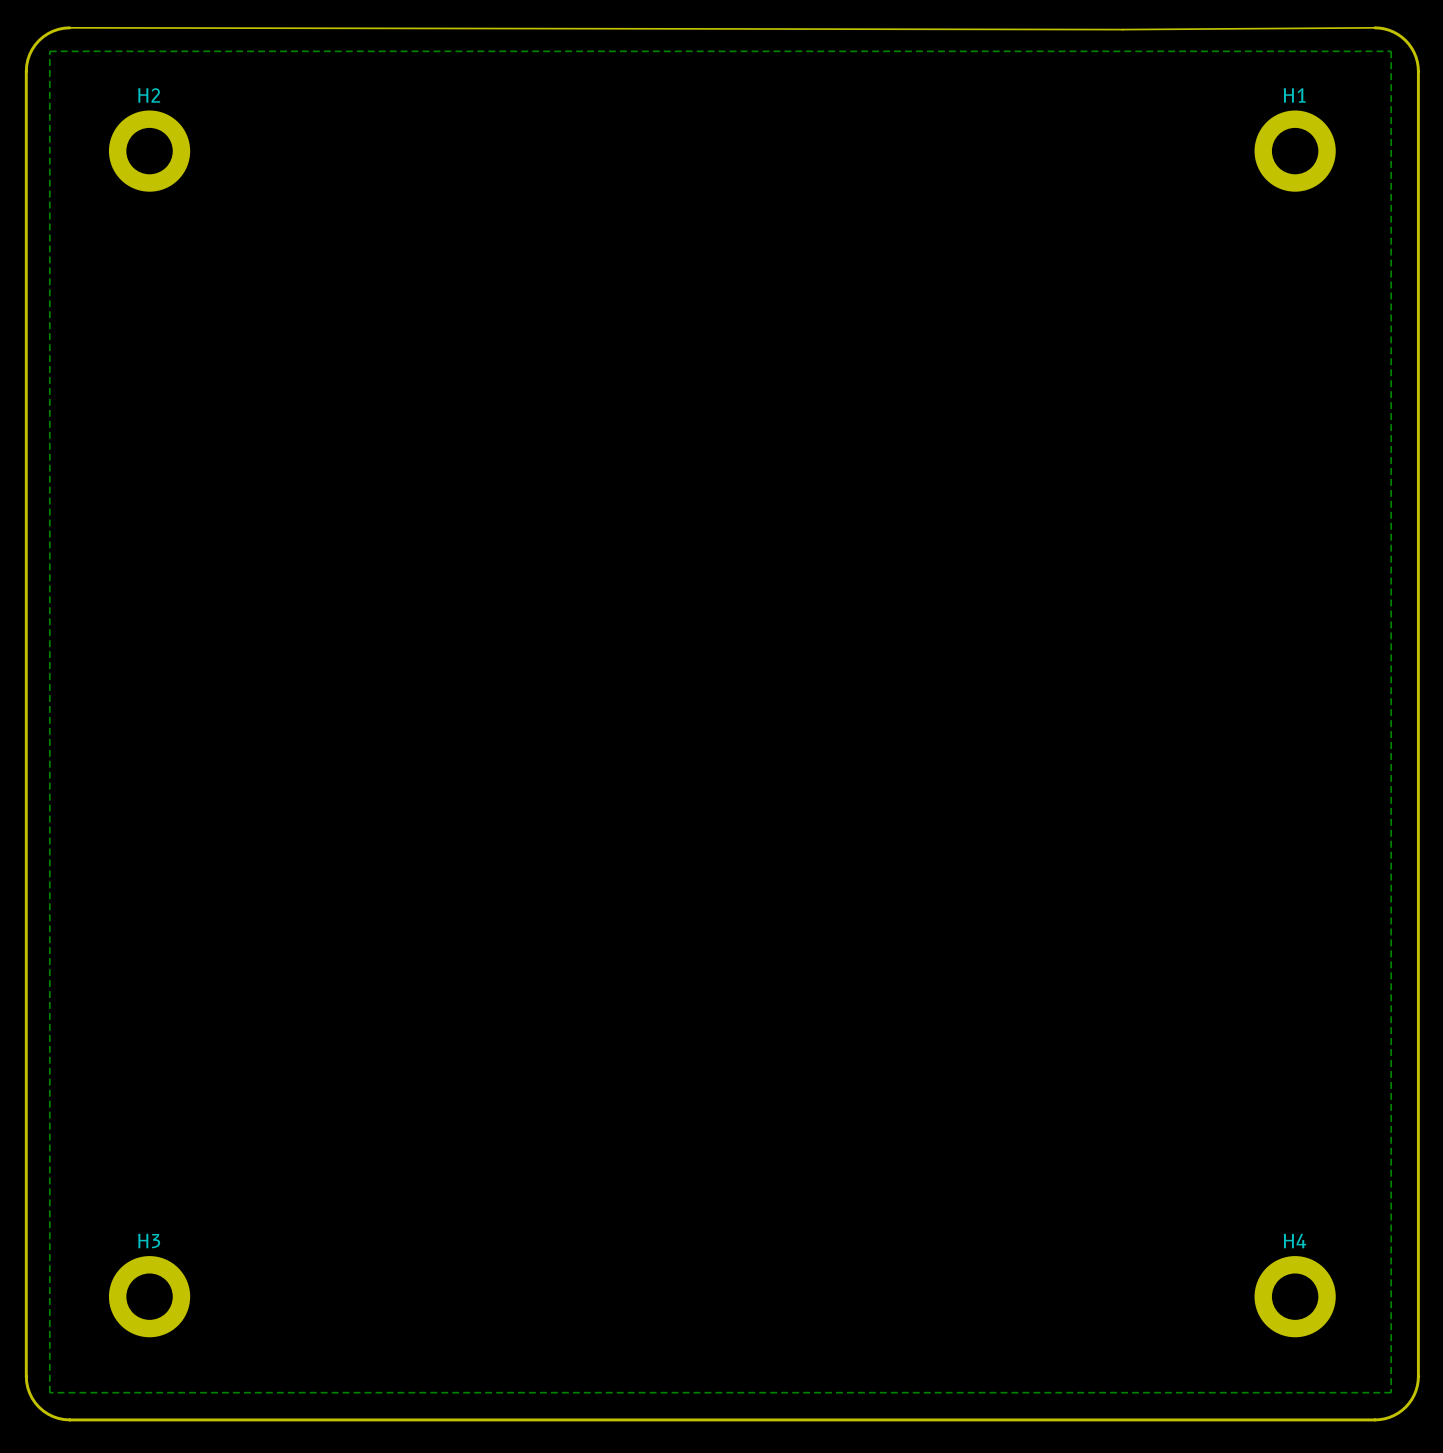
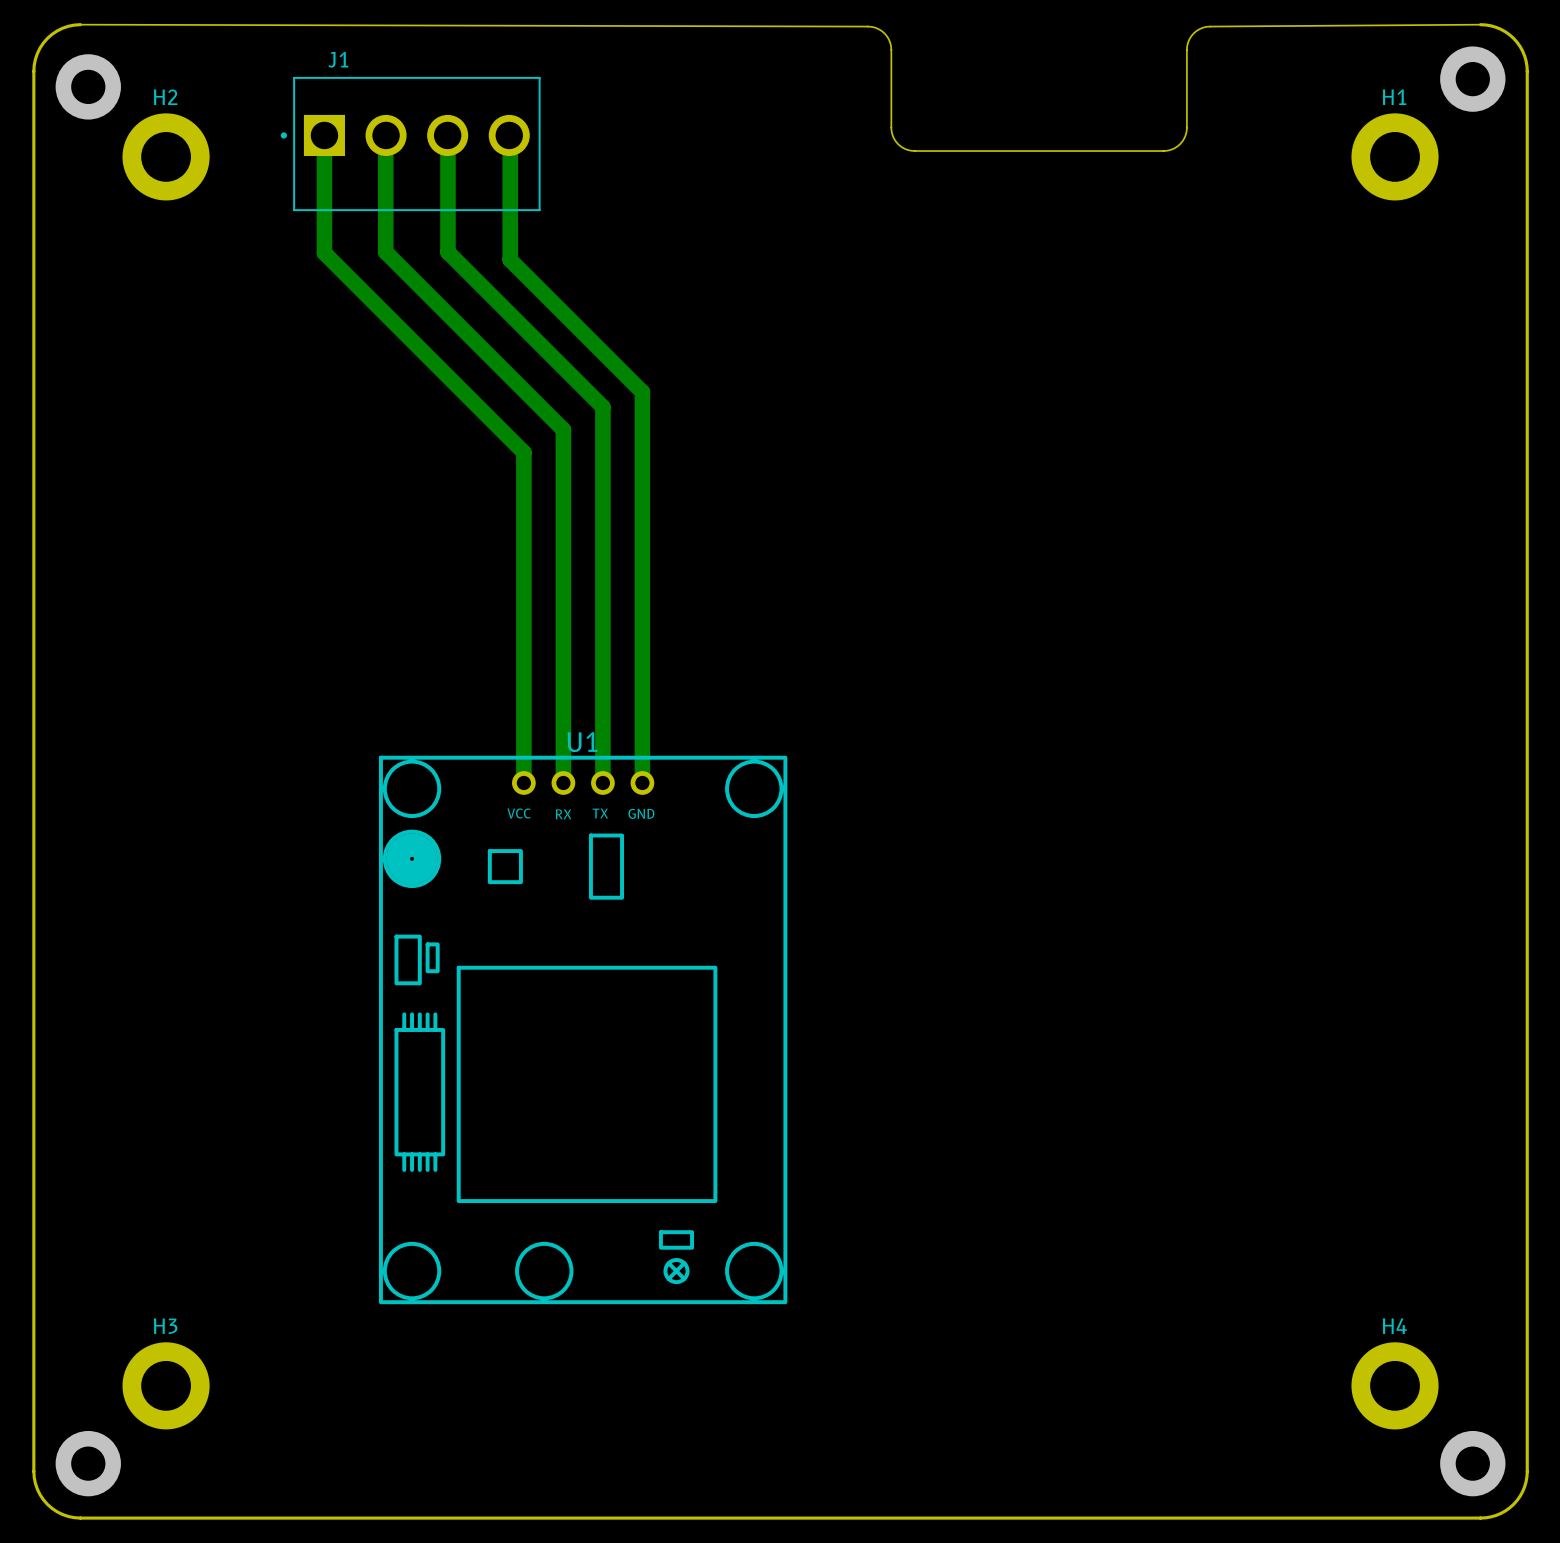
board edge: (69, 27) (1122, 29) -> (80, 24) (871, 26) (882, 31) (890, 43) (891, 127) (893, 136) (903, 147) (914, 151) (1163, 151) (1172, 149) (1182, 141) (1186, 130) (1187, 43) (1196, 31) (1210, 26)
bottom zone outline: (49, 51) (1391, 51) (1391, 1392) (49, 1392) (49, 51) -> none
via: none -> (1472, 79)
via: none -> (88, 86)
J1: none -> (410, 144)
bottom track: none -> (324, 151) (324, 253) (523, 452) (523, 782)
bottom track: none -> (386, 151) (385, 252) (563, 429) (563, 782)
bottom track: none -> (447, 151) (447, 252) (602, 407) (602, 782)
bottom track: none -> (509, 151) (510, 259) (642, 392) (642, 782)
U1: none -> (583, 1029)
via: none -> (88, 1463)
via: none -> (1472, 1463)

